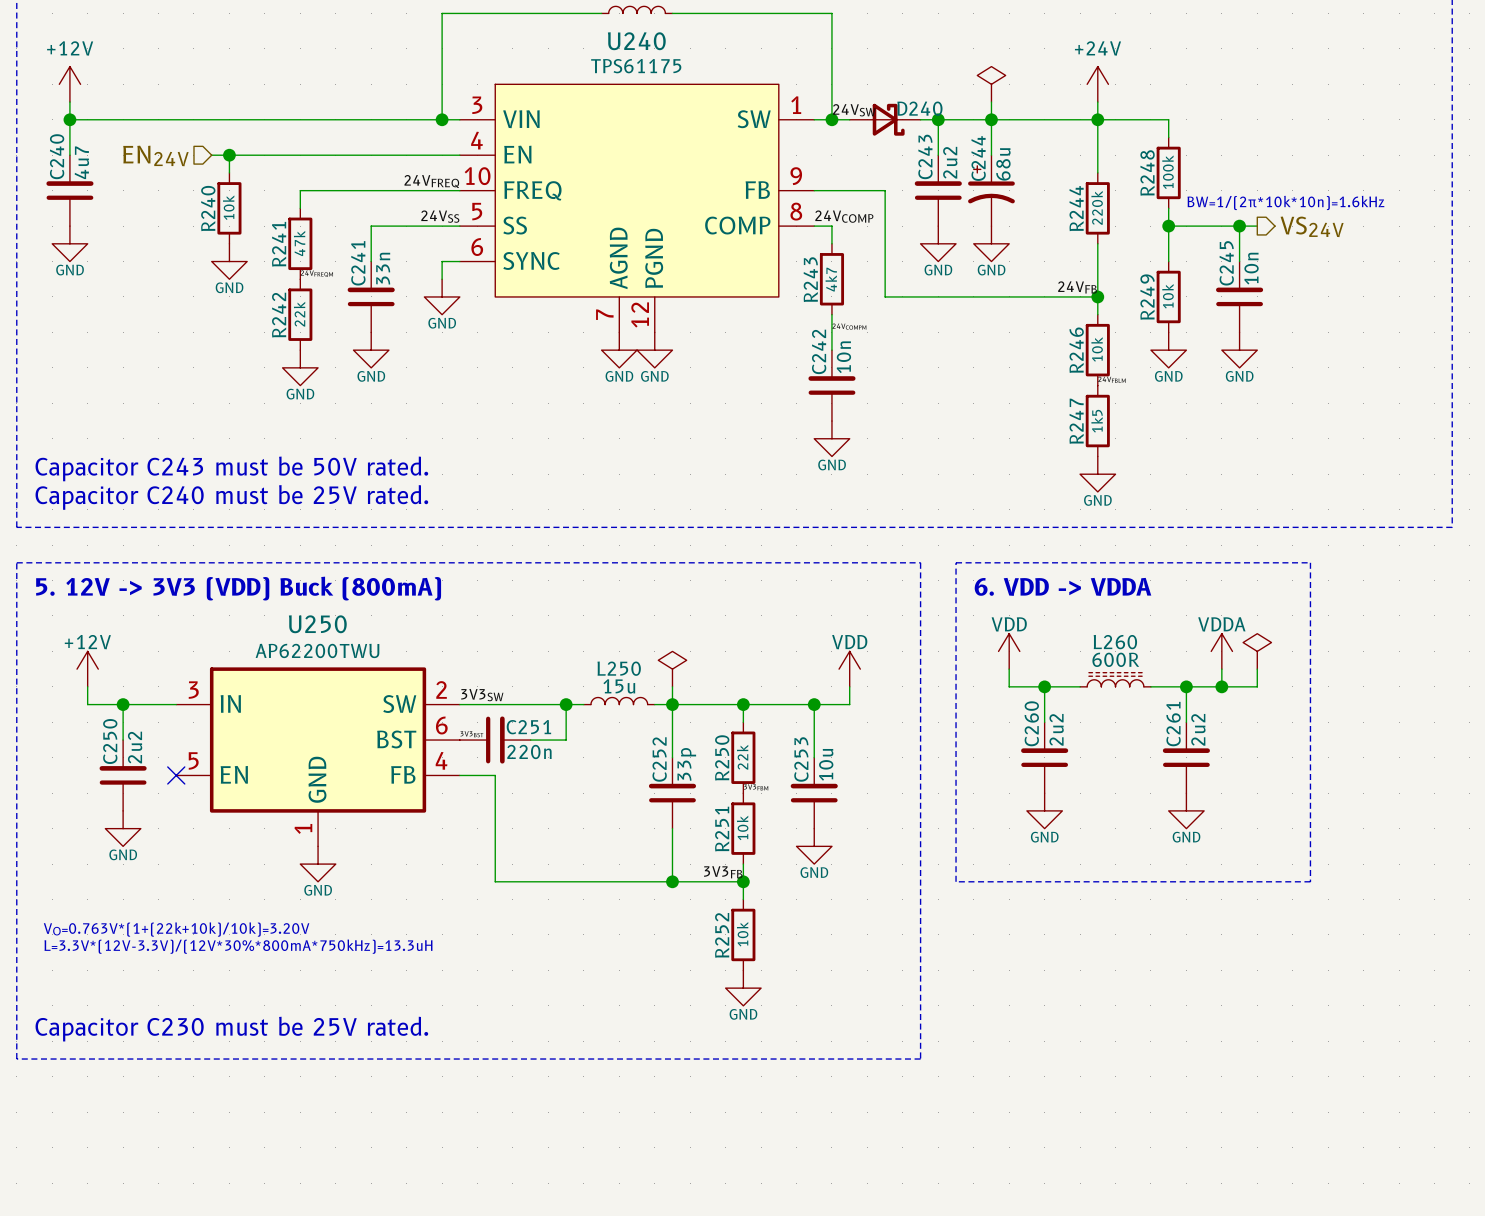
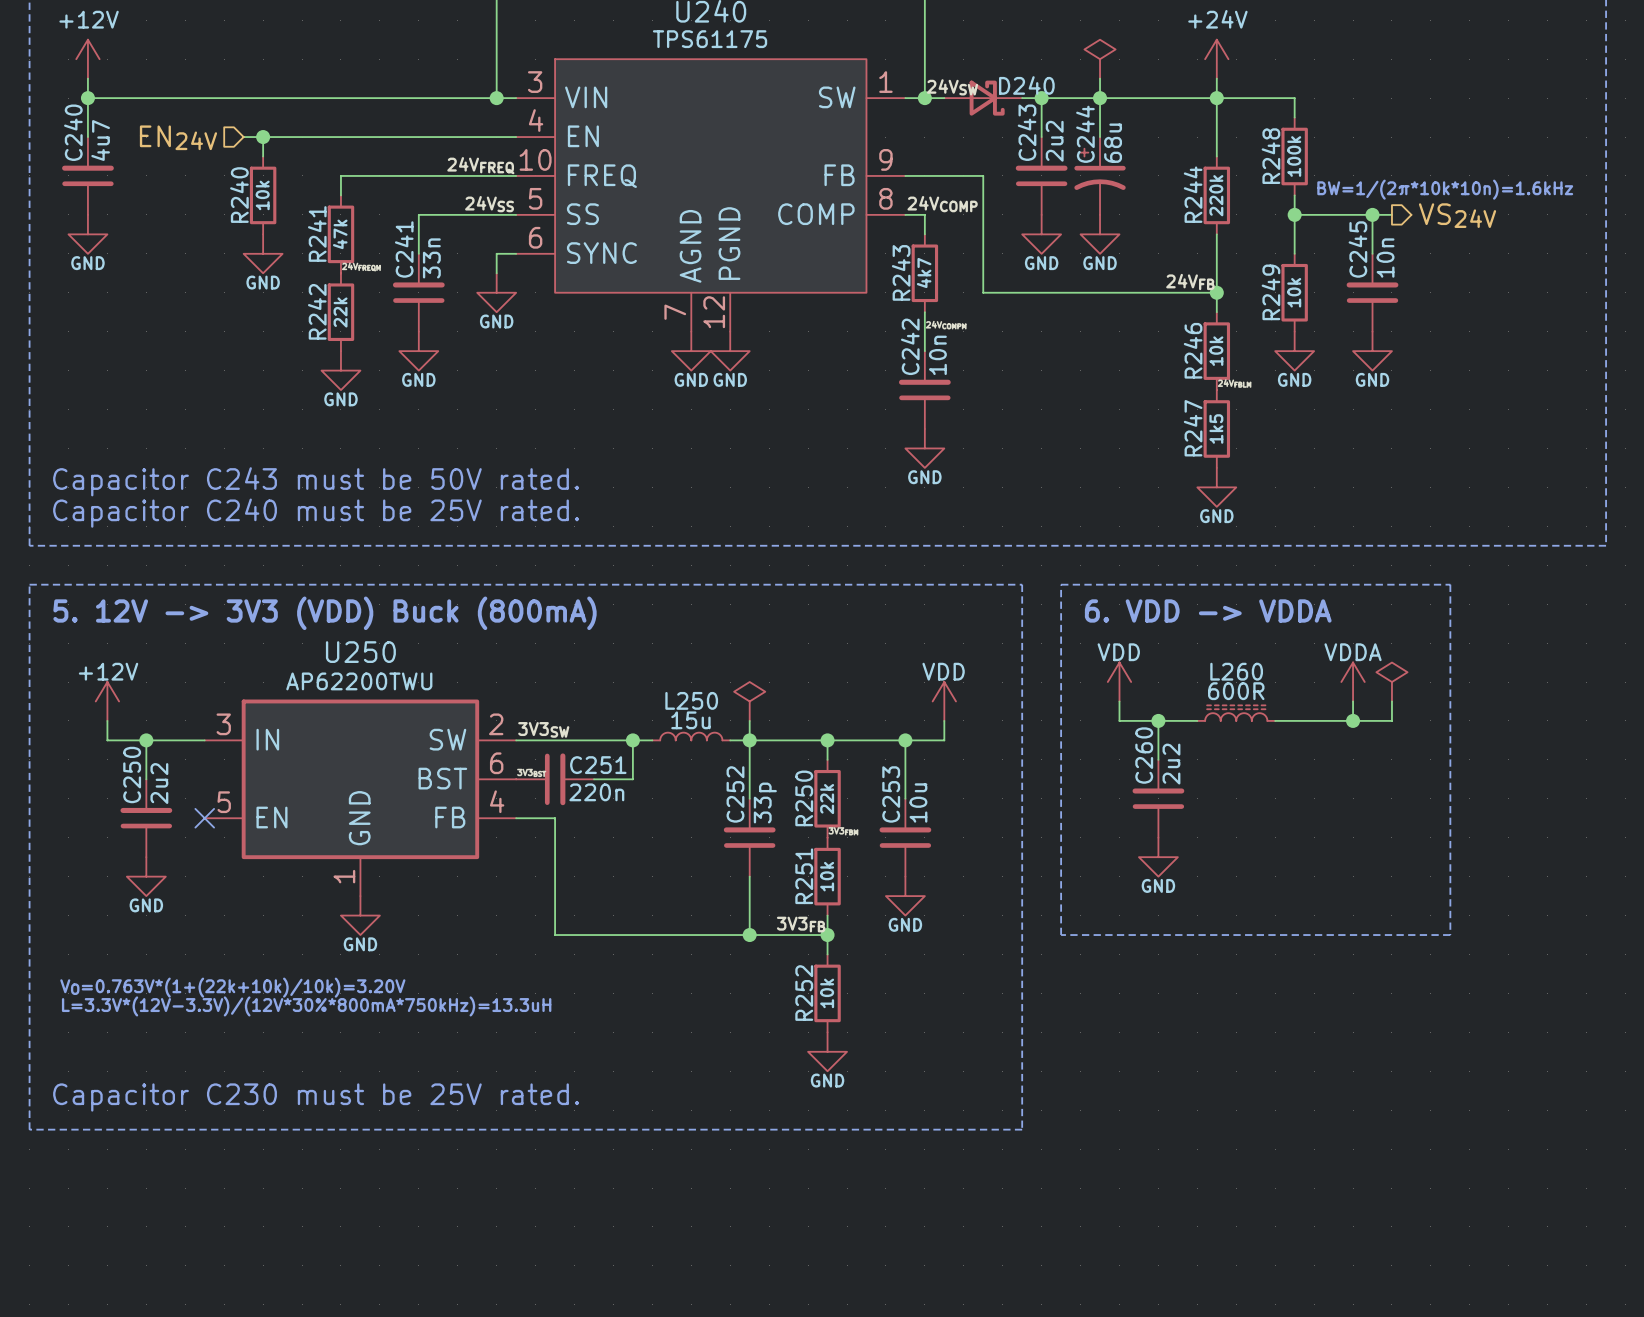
wire: (1186, 686) (1186, 722) -> none
junction: (1186, 686) -> none
C261: 2u2 (1186, 757) -> none
power symbol: GND (1186, 810) -> none

